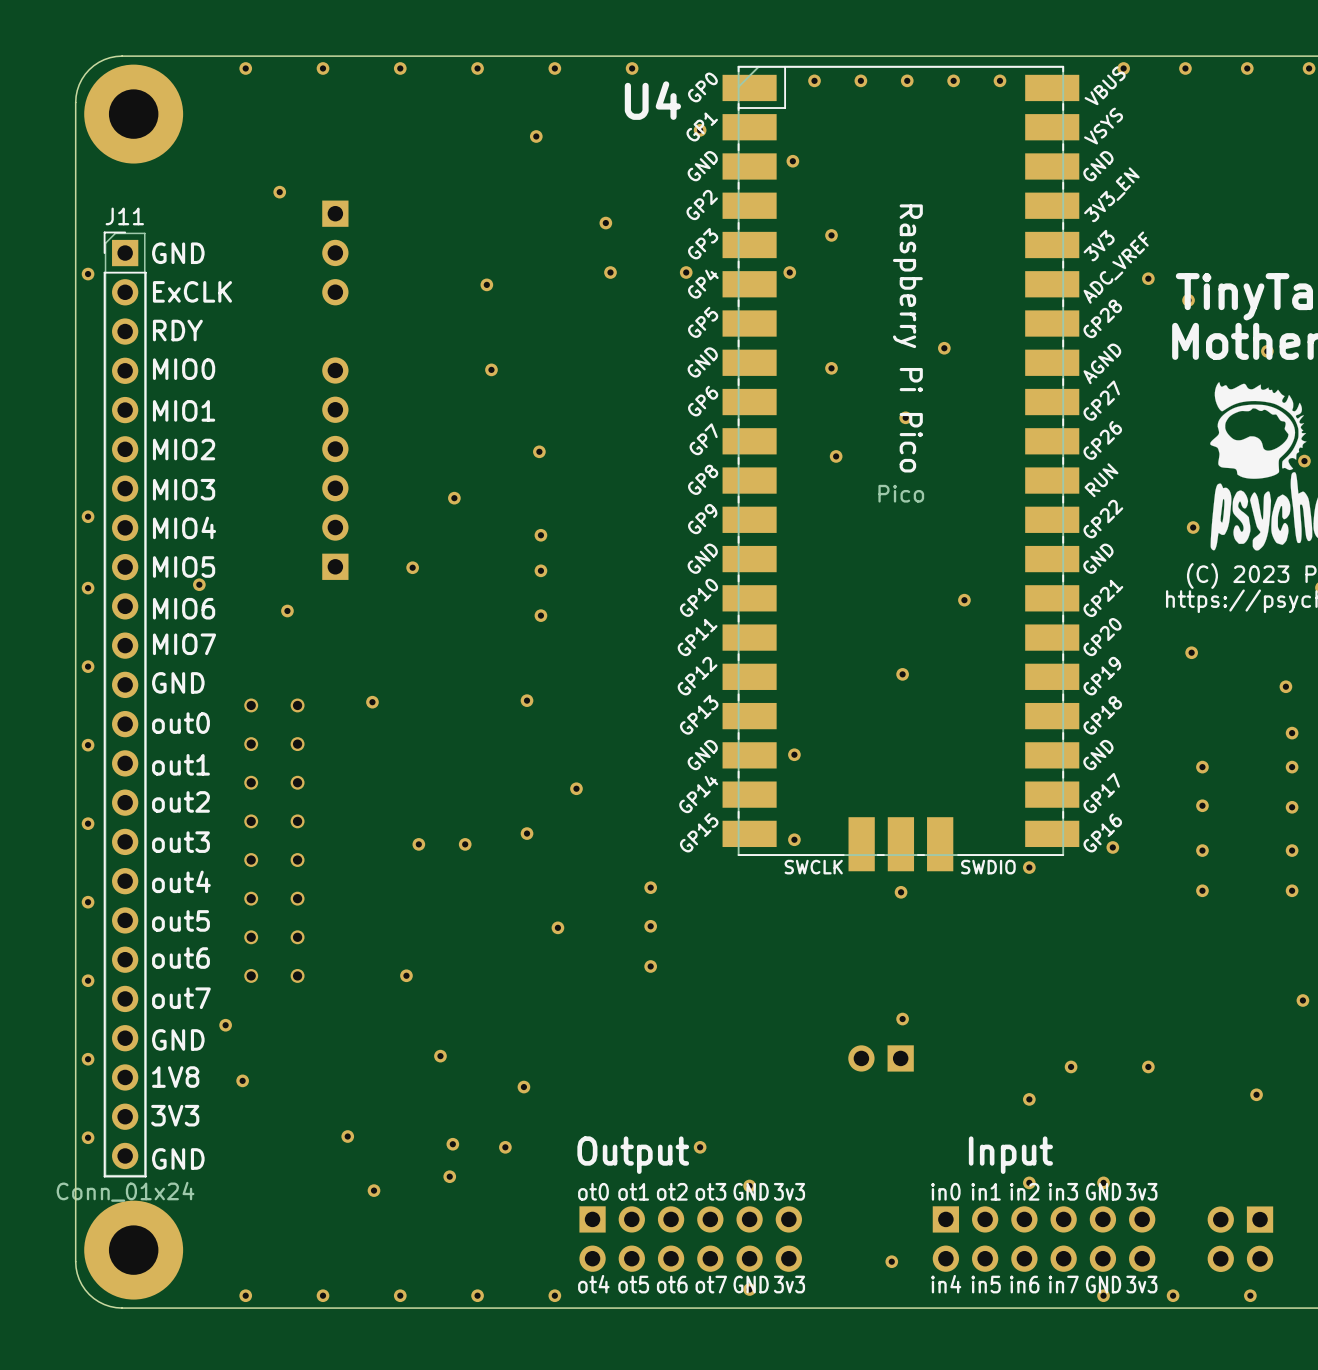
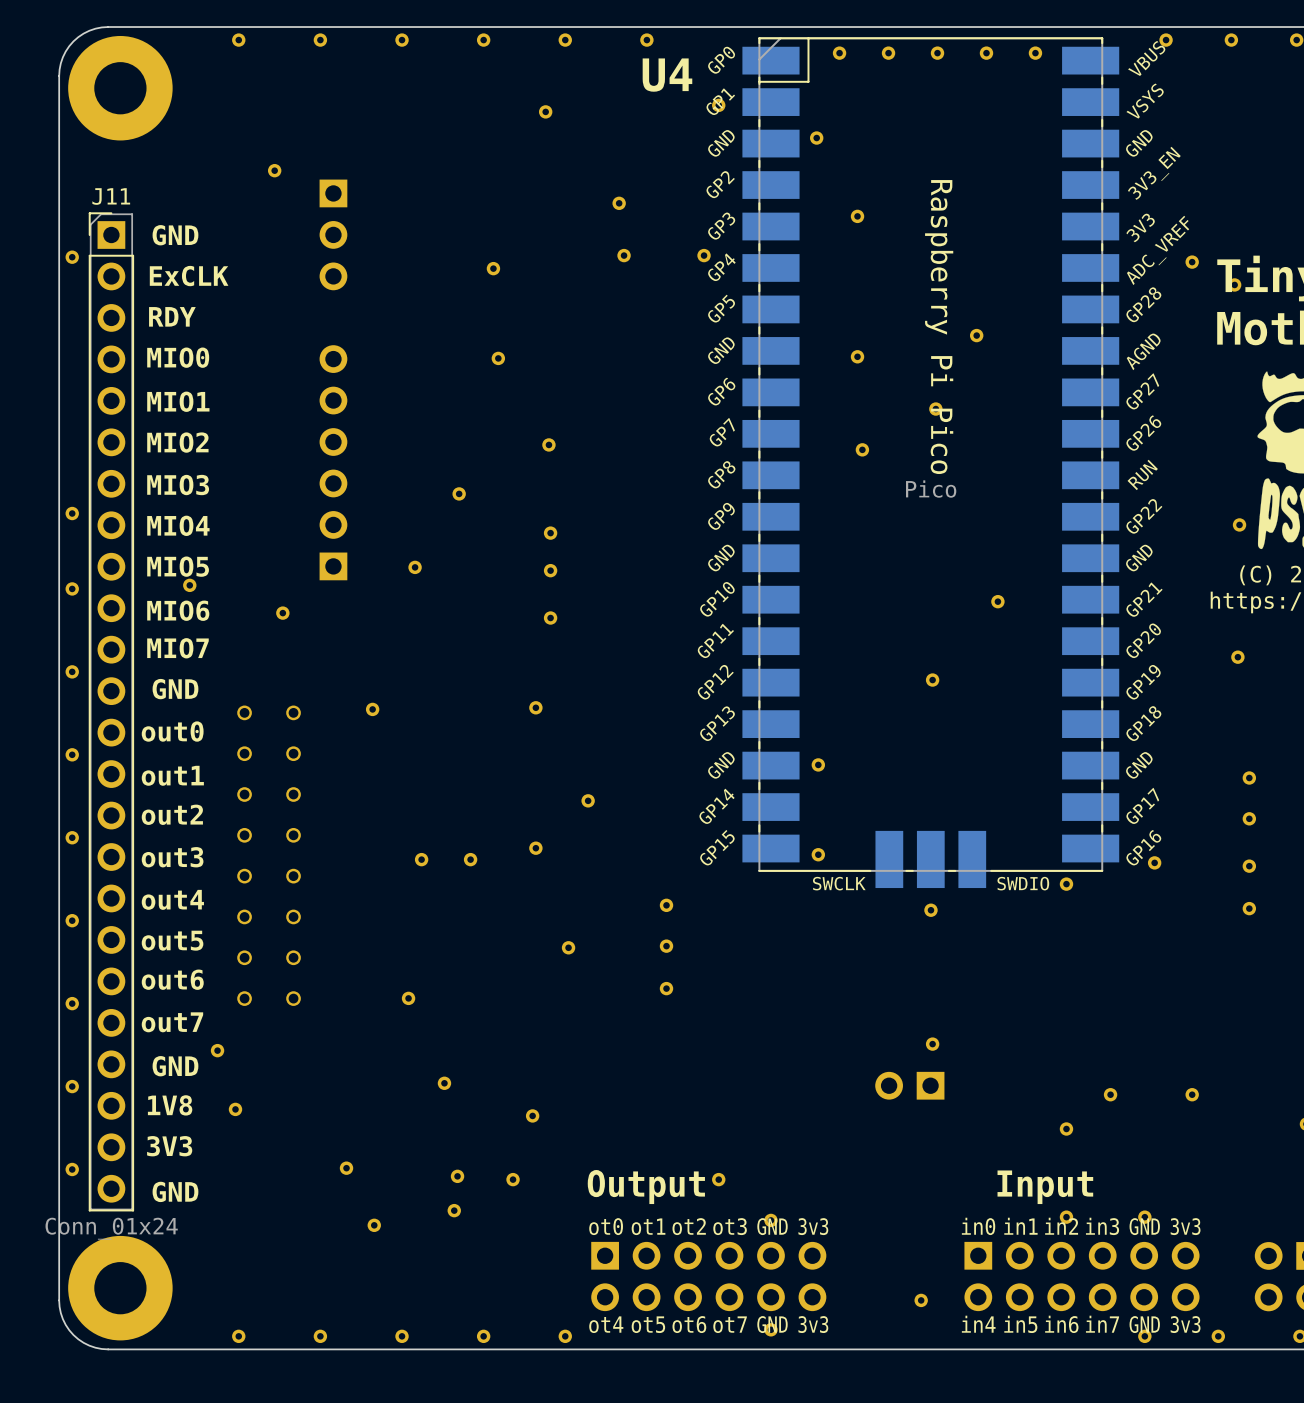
part: (789, 272) -> none

